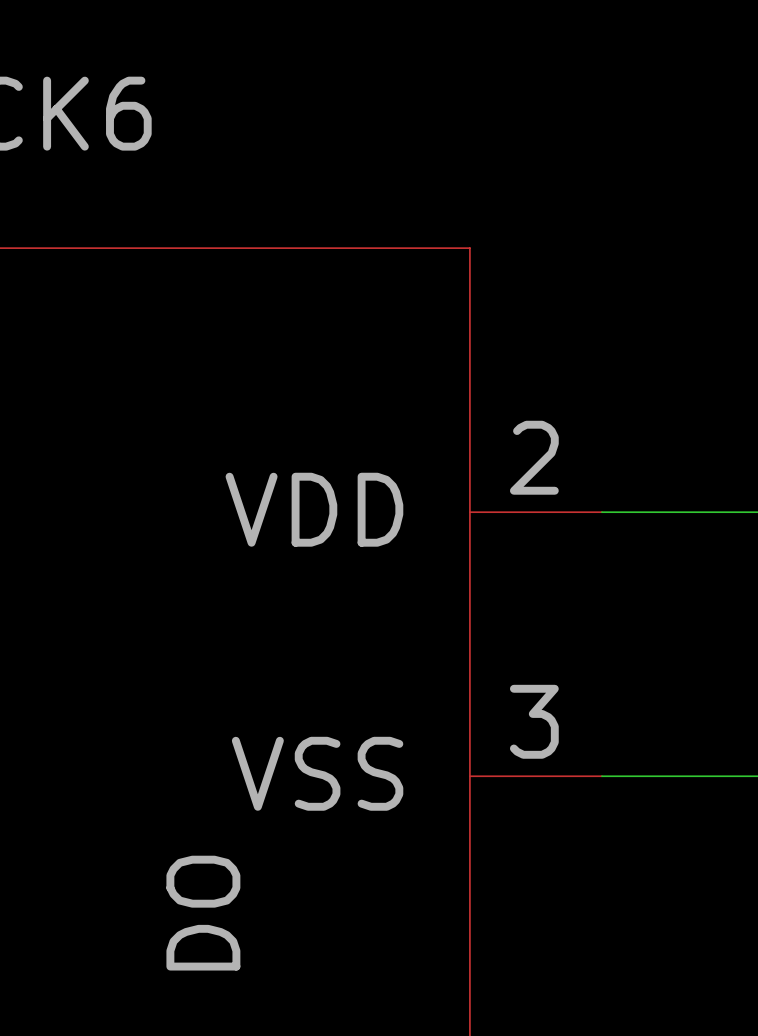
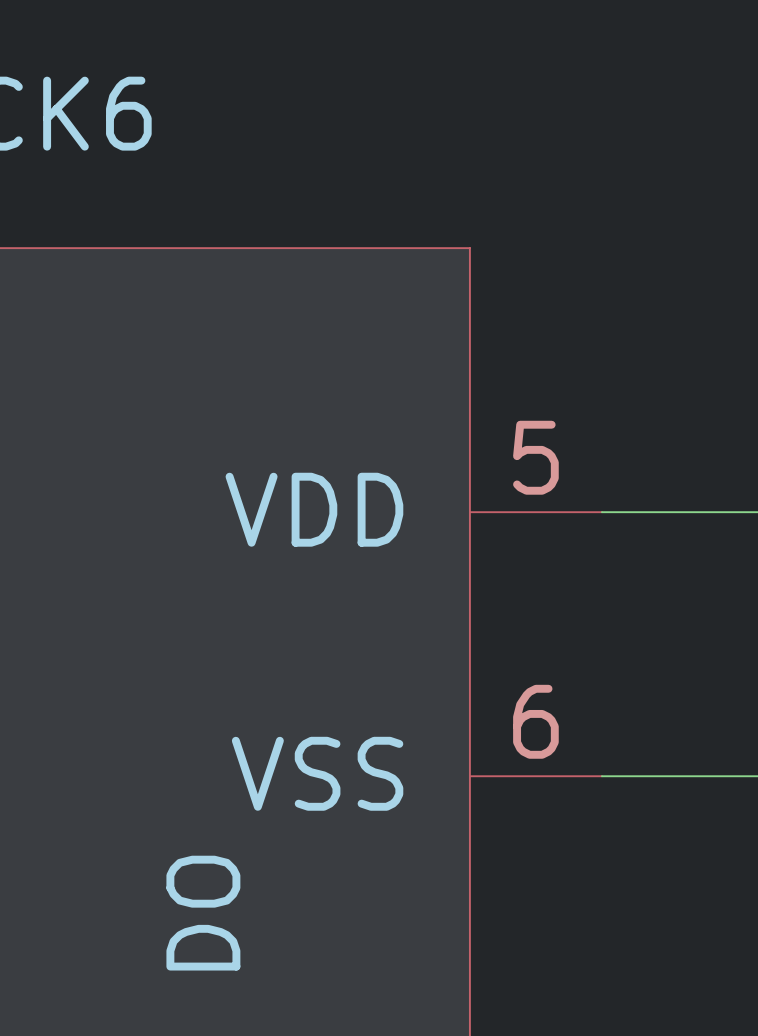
part pin number: 2 (534, 457) -> 5 (535, 457)
part pin number: 3 (534, 721) -> 6 (535, 721)

